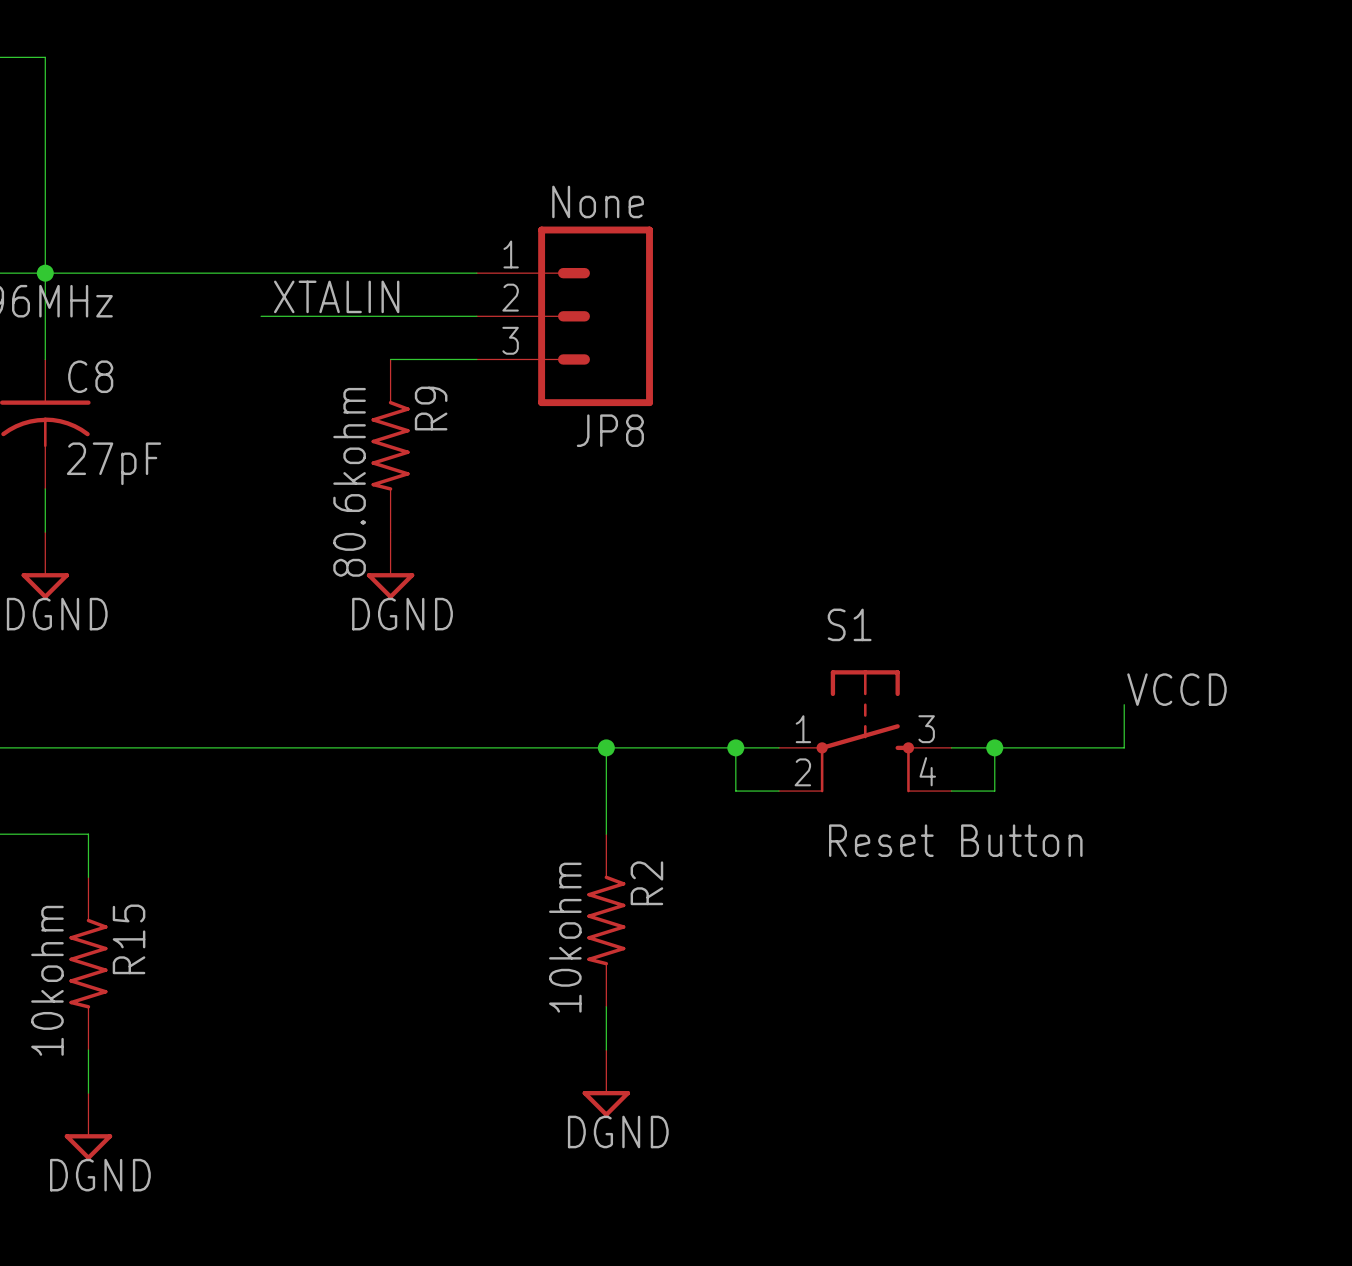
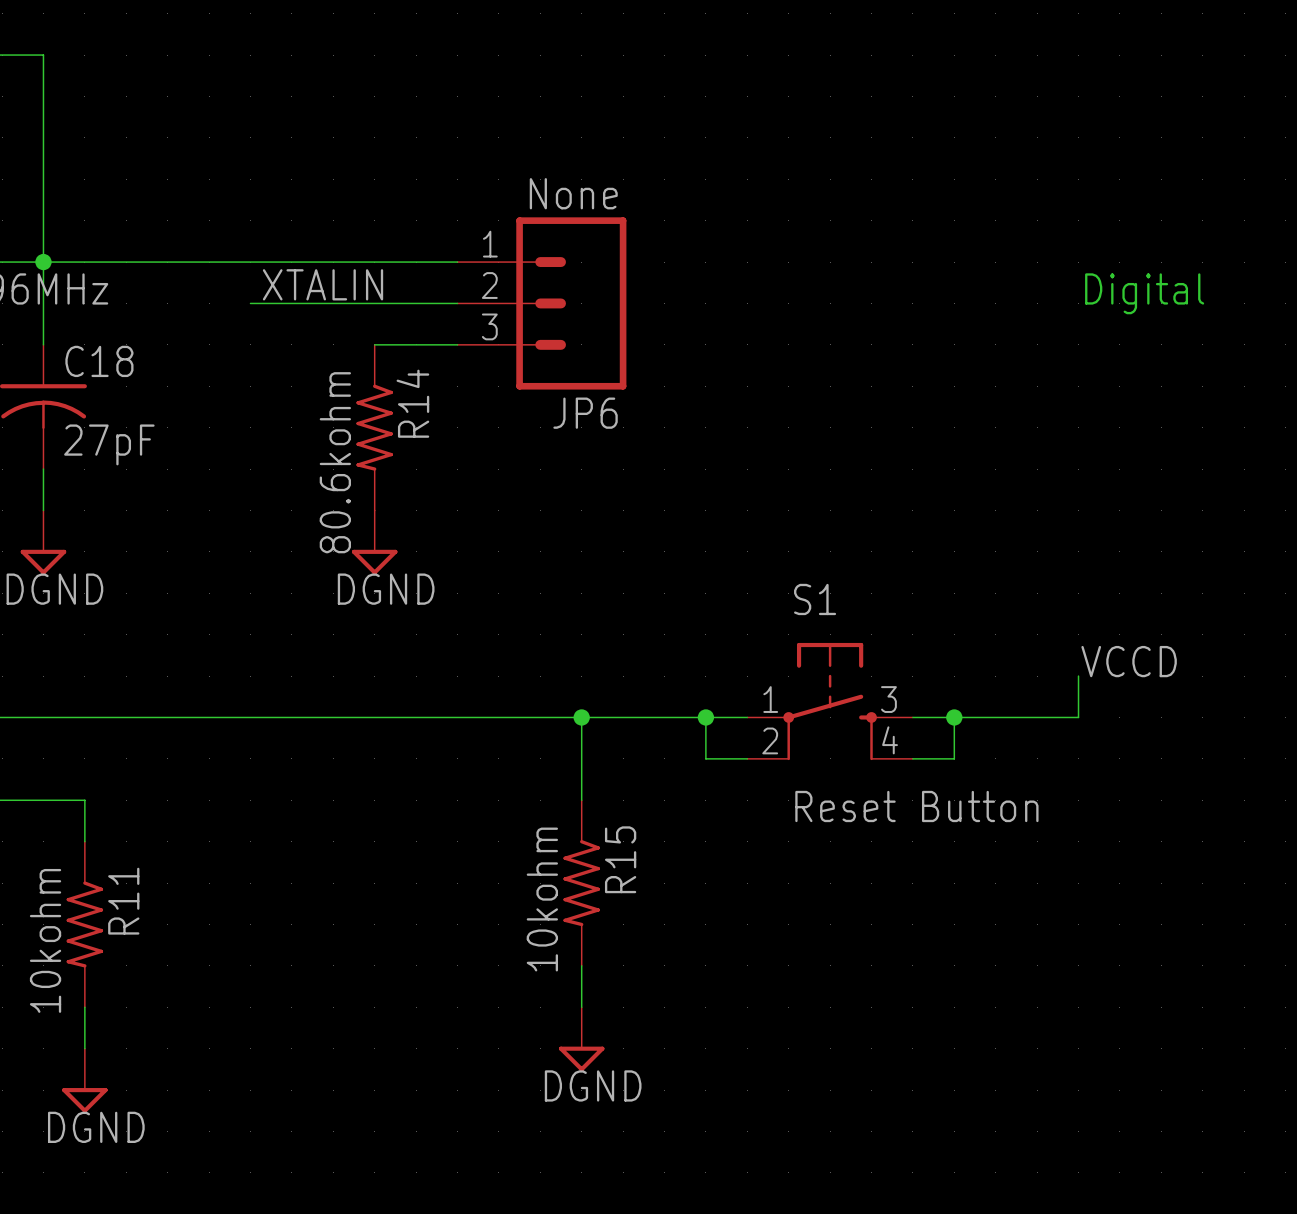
text: none -> Digital (1144, 293)
C8 name: C8 (90, 376) -> C18 (99, 361)
R9 name: R9 (431, 408) -> R14 (412, 403)
JP8 name: JP8 (610, 430) -> JP6 (585, 413)
R2 name: R2 (646, 883) -> R15 (620, 859)
R15 name: R15 (129, 939) -> R11 (123, 901)

